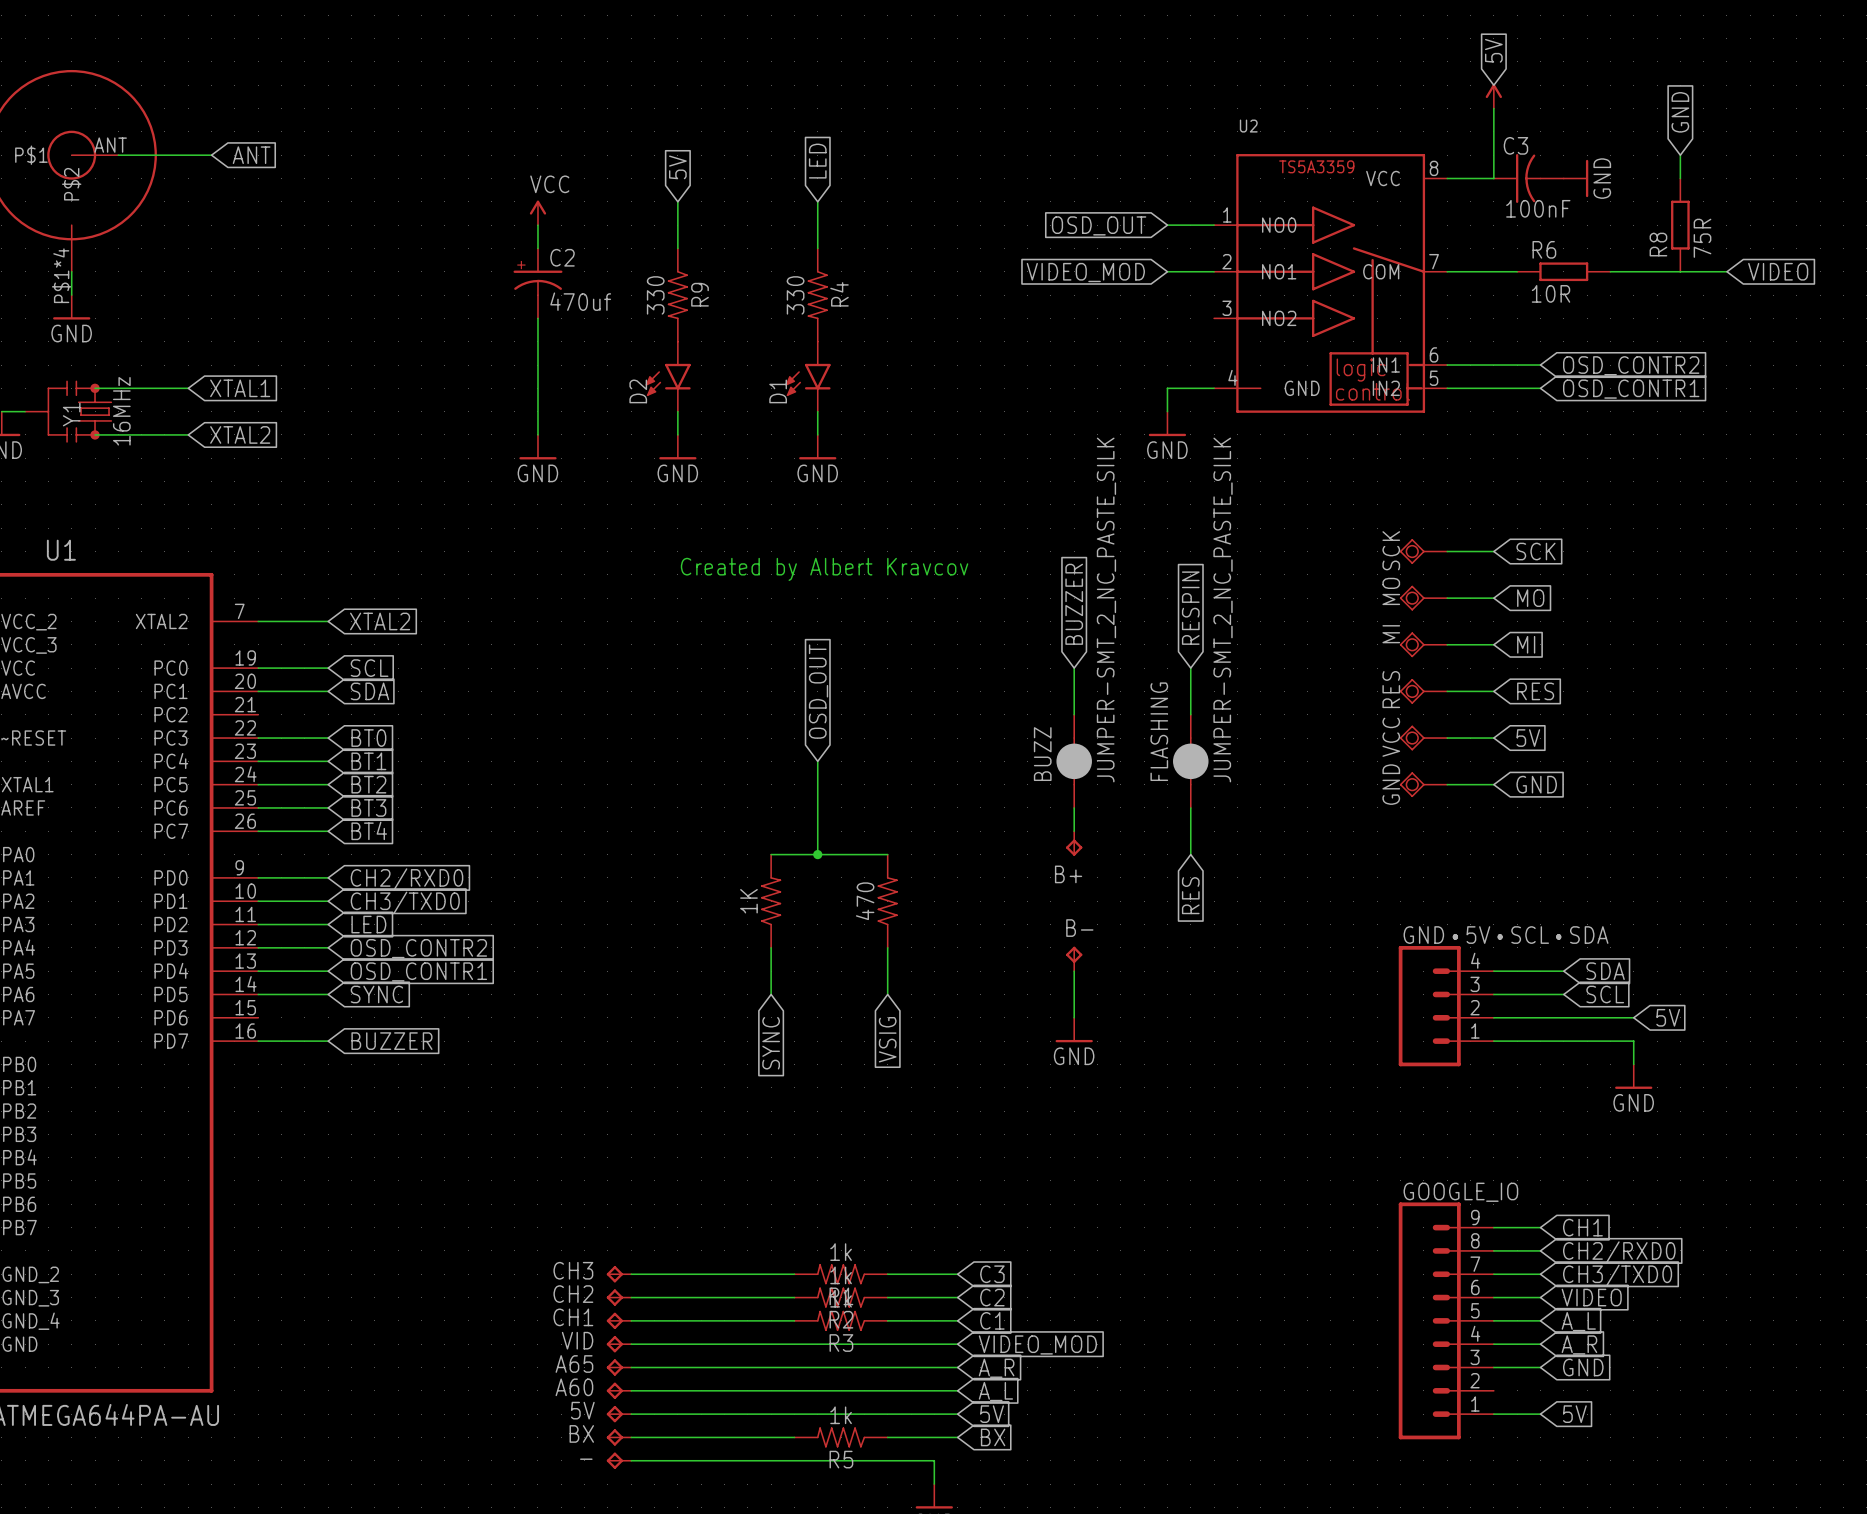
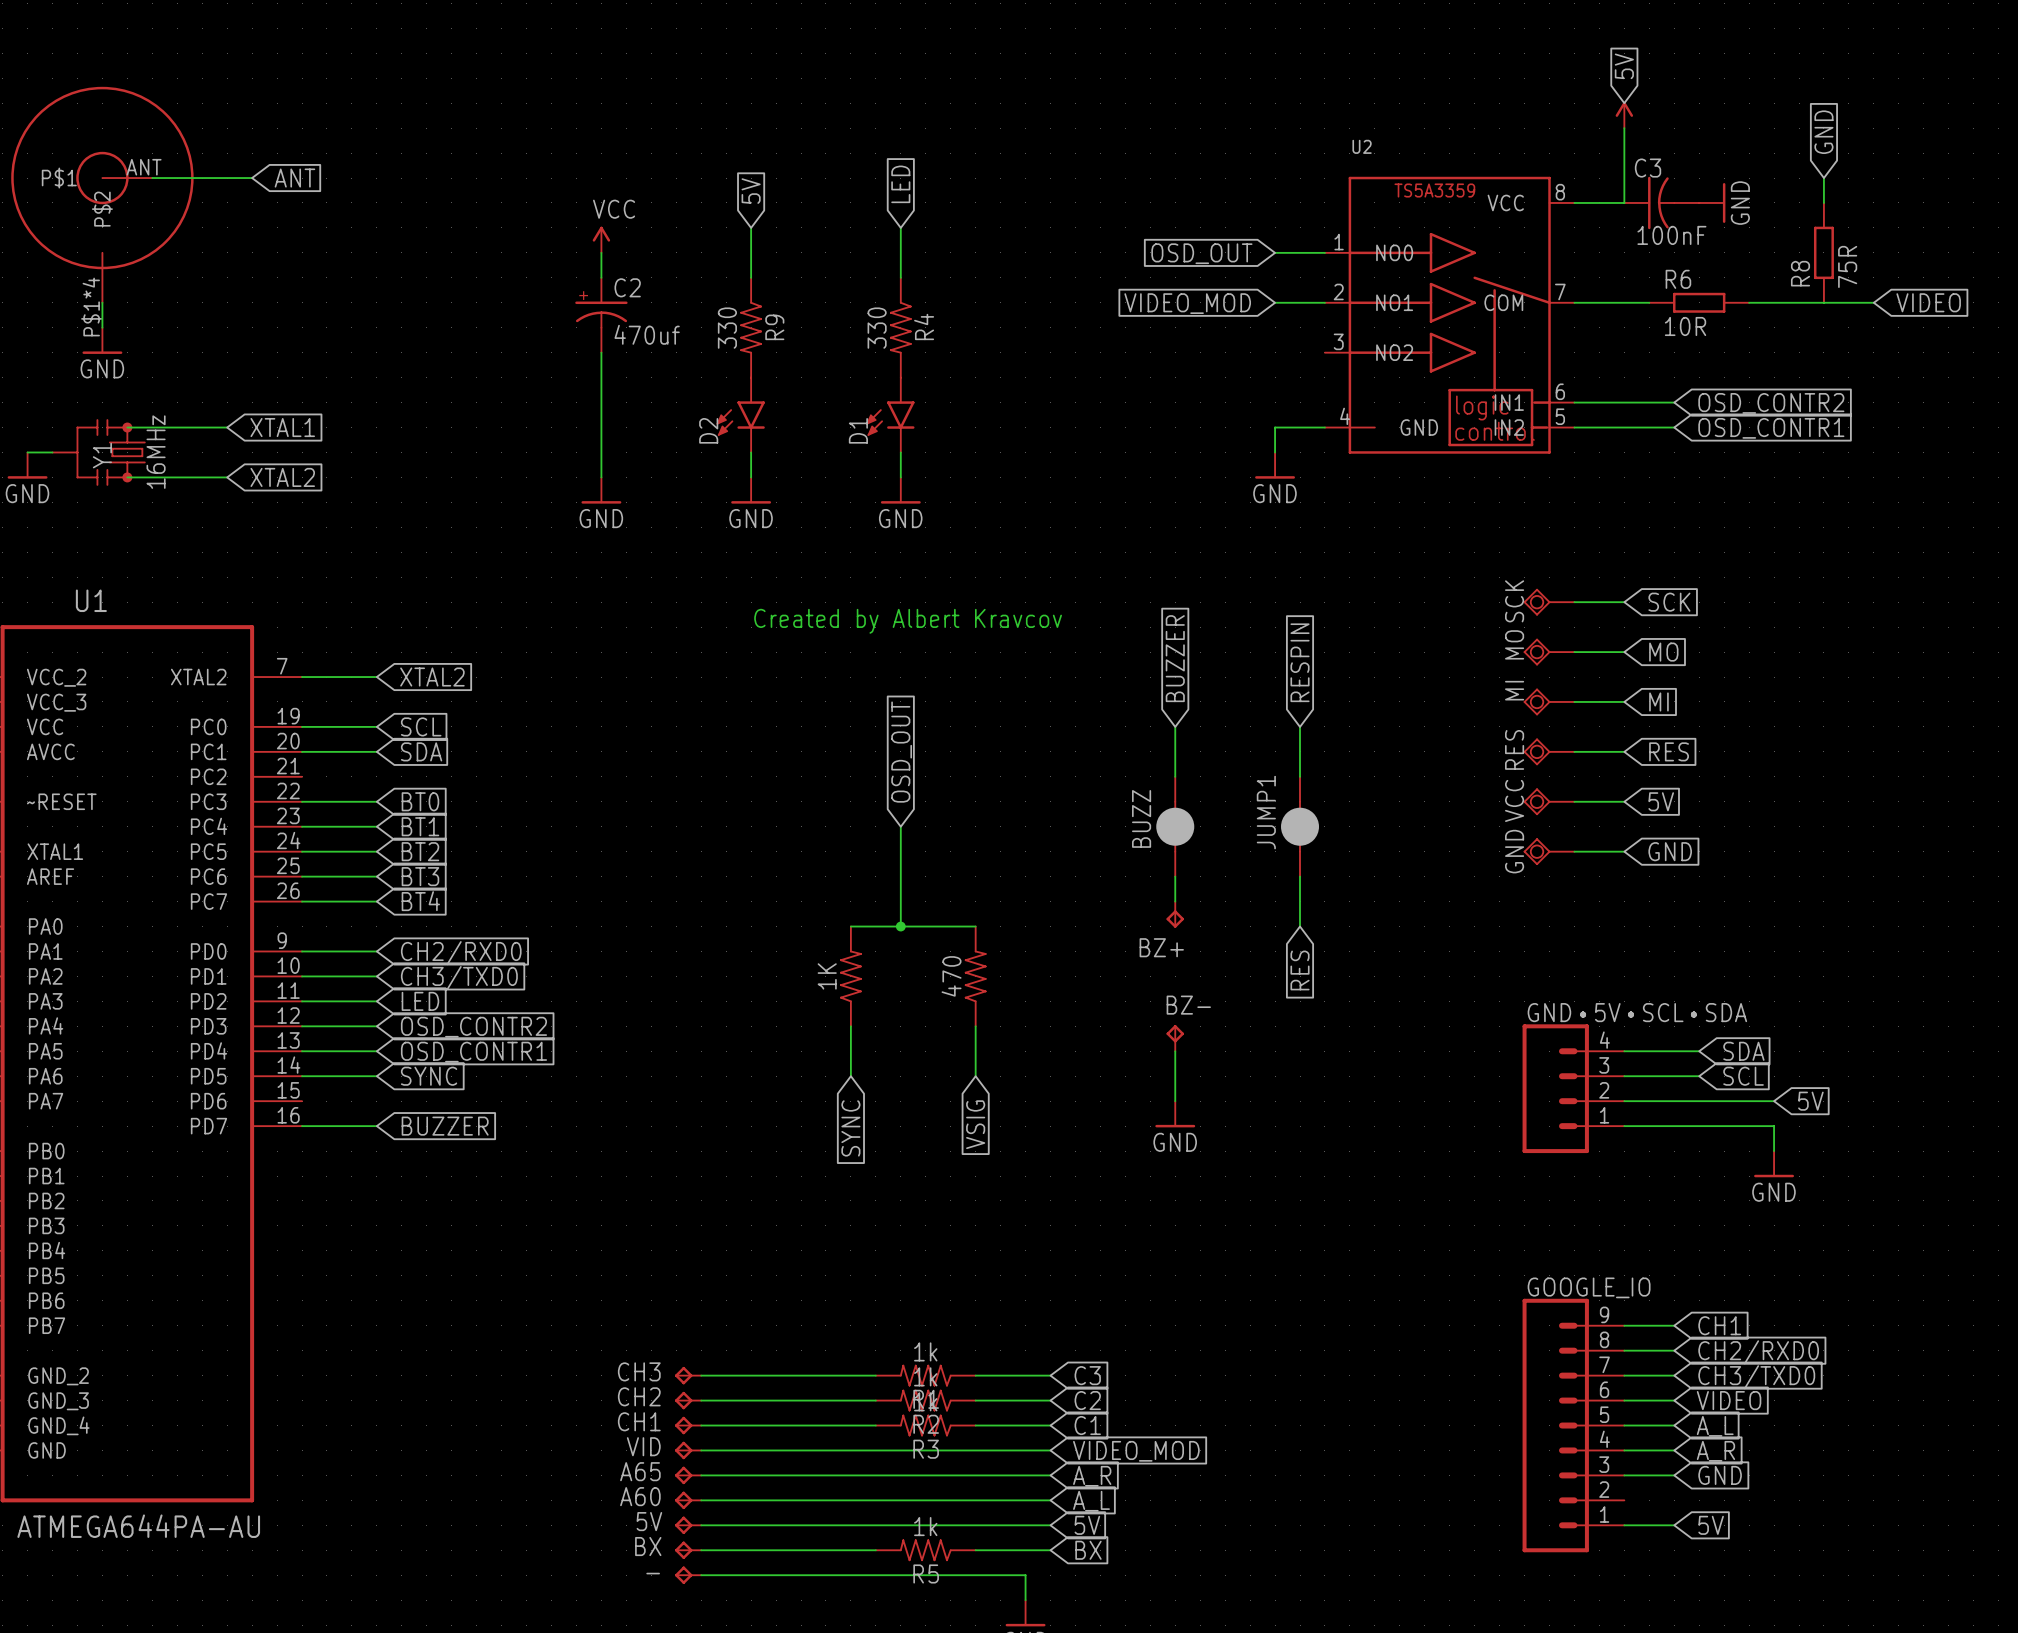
BUZZ value: JUMPER-SMT_2_NC_PASTE_SILK (1106, 609) -> none
FLASHING value: JUMPER-SMT_2_NC_PASTE_SILK (1223, 609) -> none
FLASHING name: FLASHING (1159, 731) -> JUMP1 (1266, 812)
B+ name: B+ (1068, 874) -> BZ+ (1161, 947)
B- name: B- (1079, 928) -> BZ- (1188, 1005)

